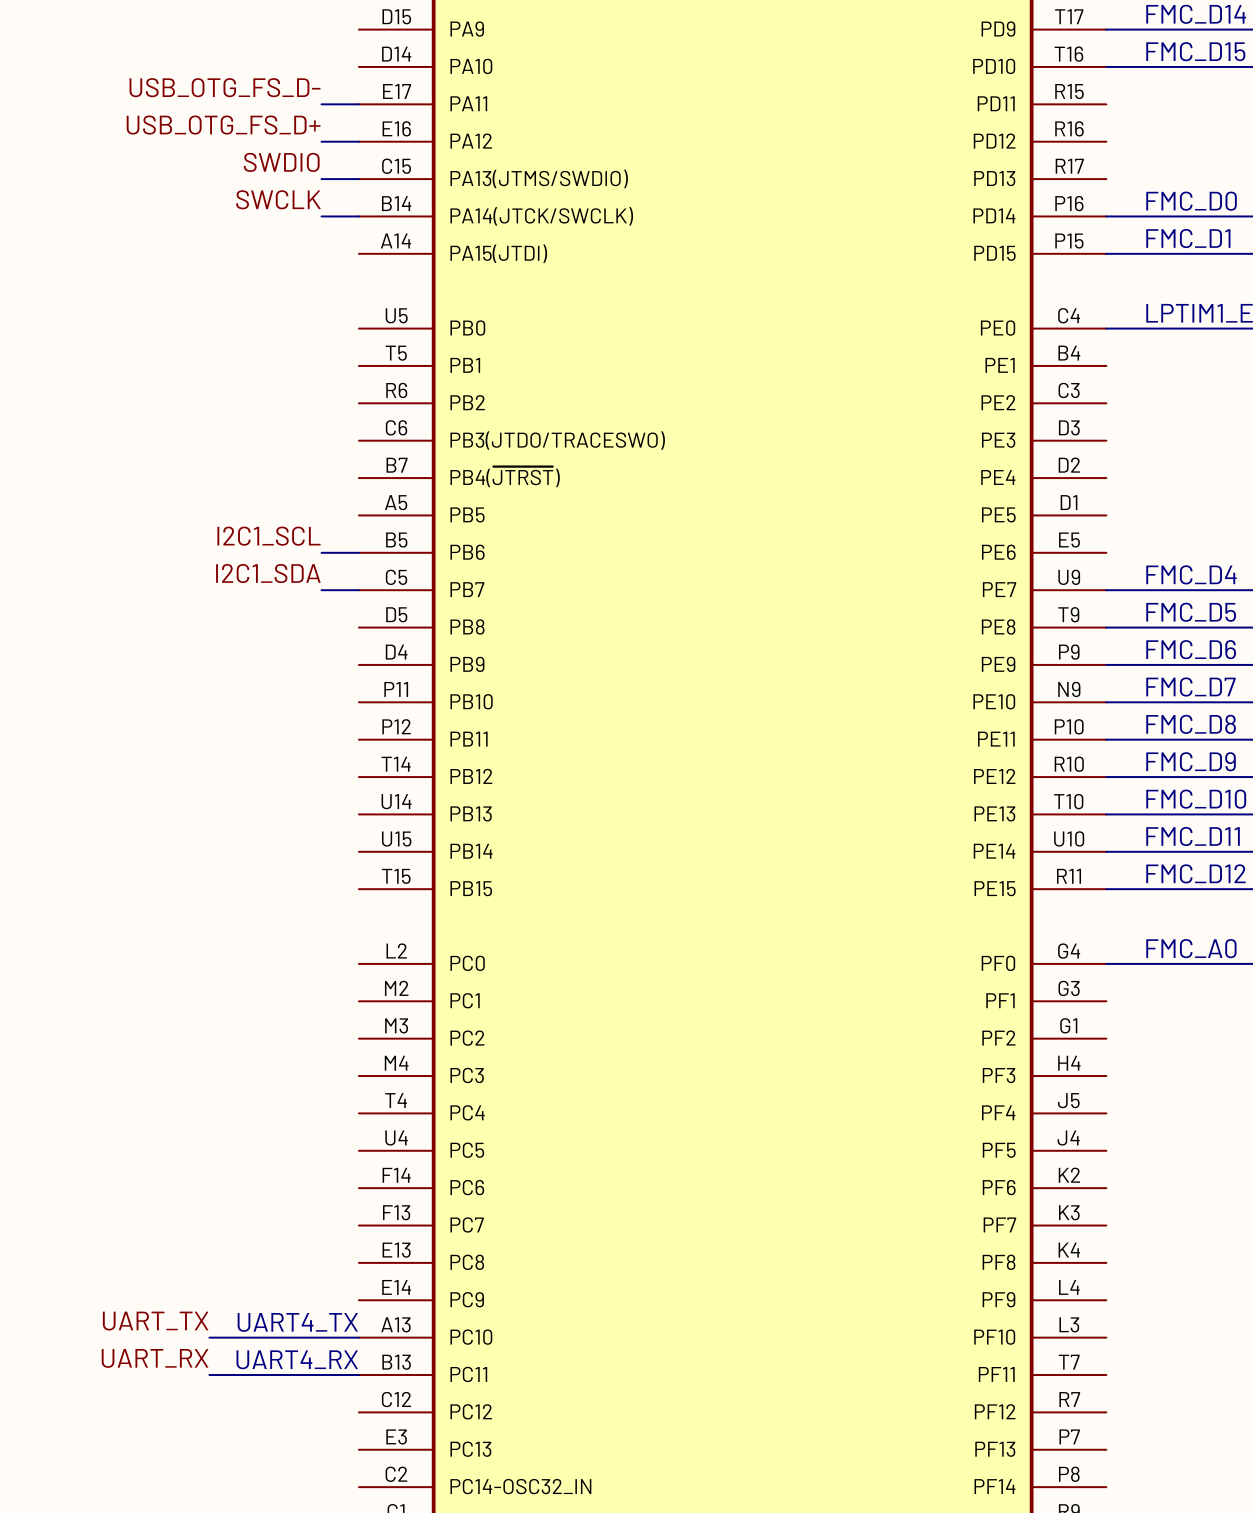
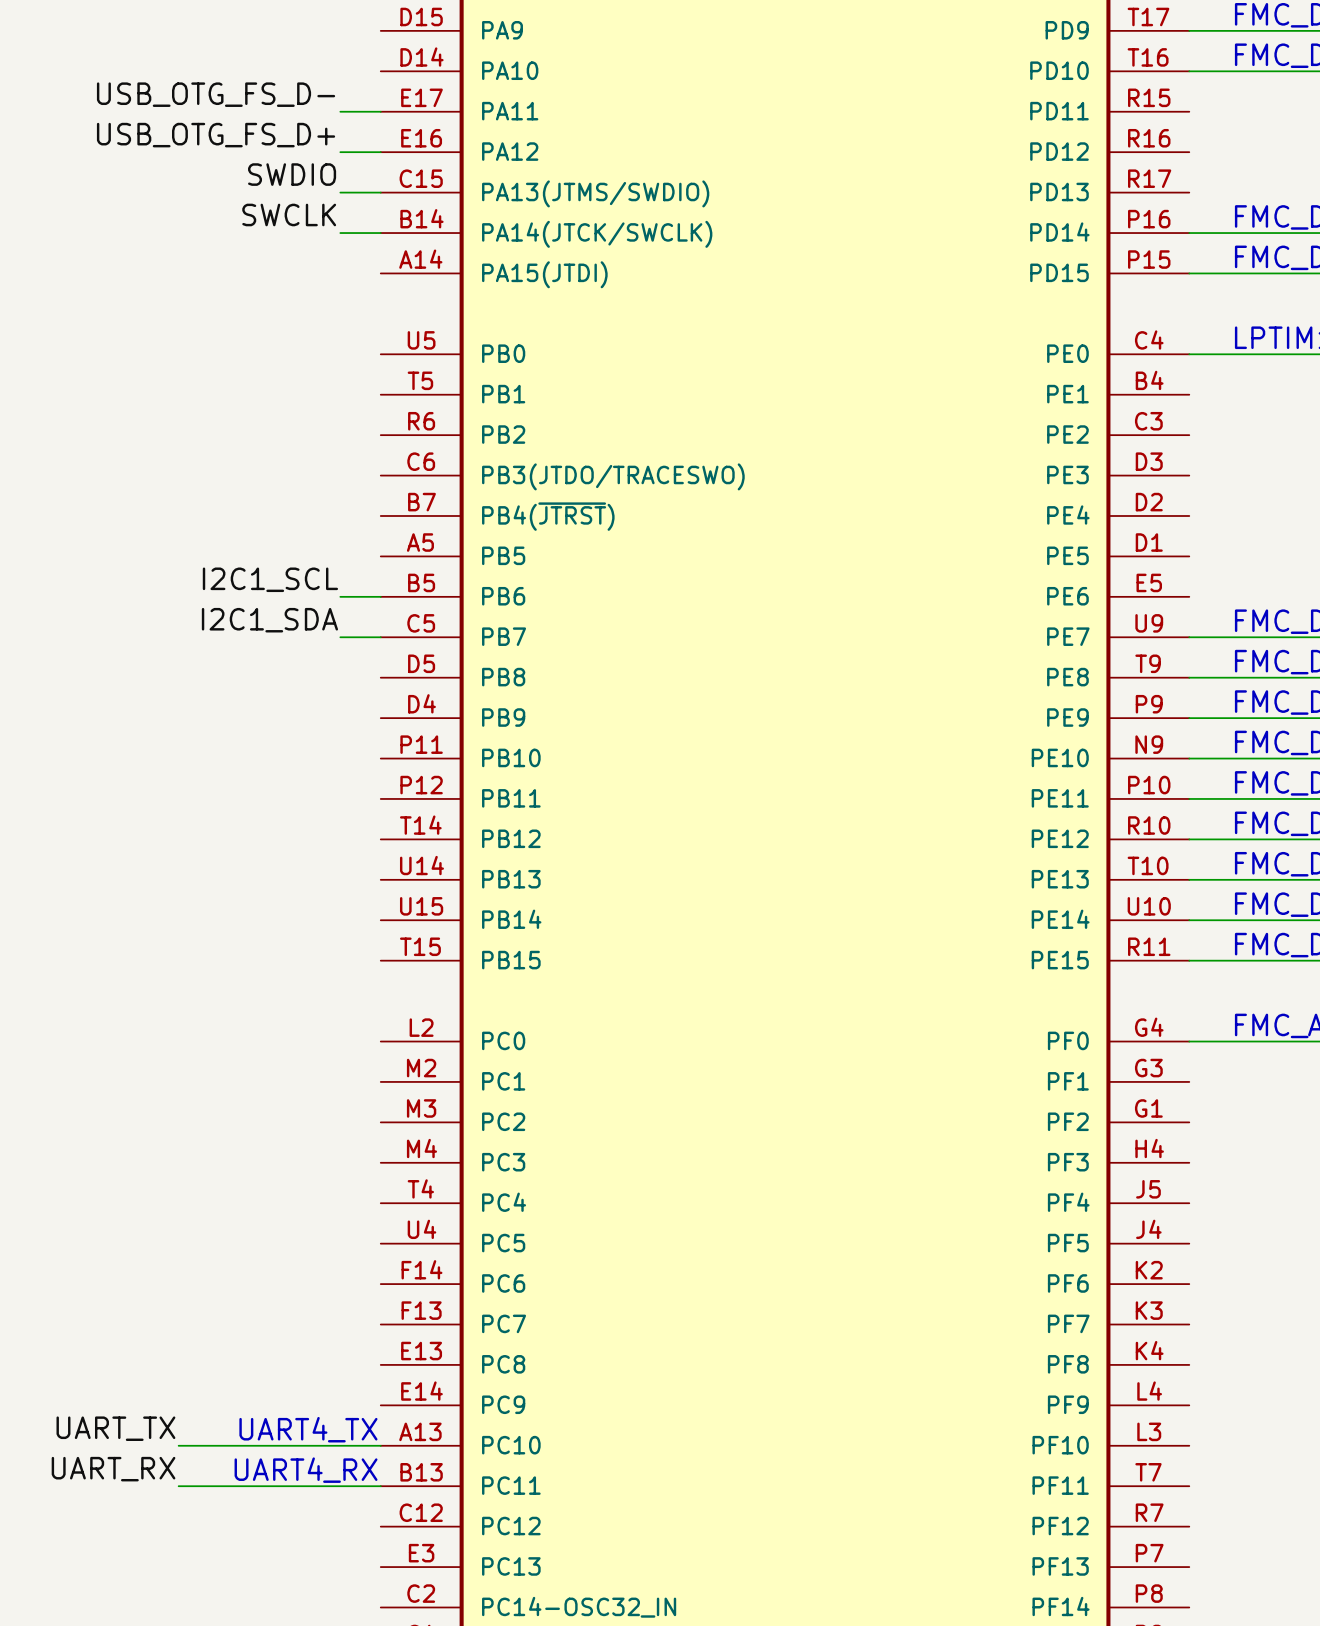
label position: UART_TX (155, 1321) -> UART_TX (115, 1428)
wire: none -> (178, 1445) (219, 1445)
label position: UART_RX (155, 1358) -> UART_RX (113, 1469)
wire: none -> (178, 1486) (219, 1486)

